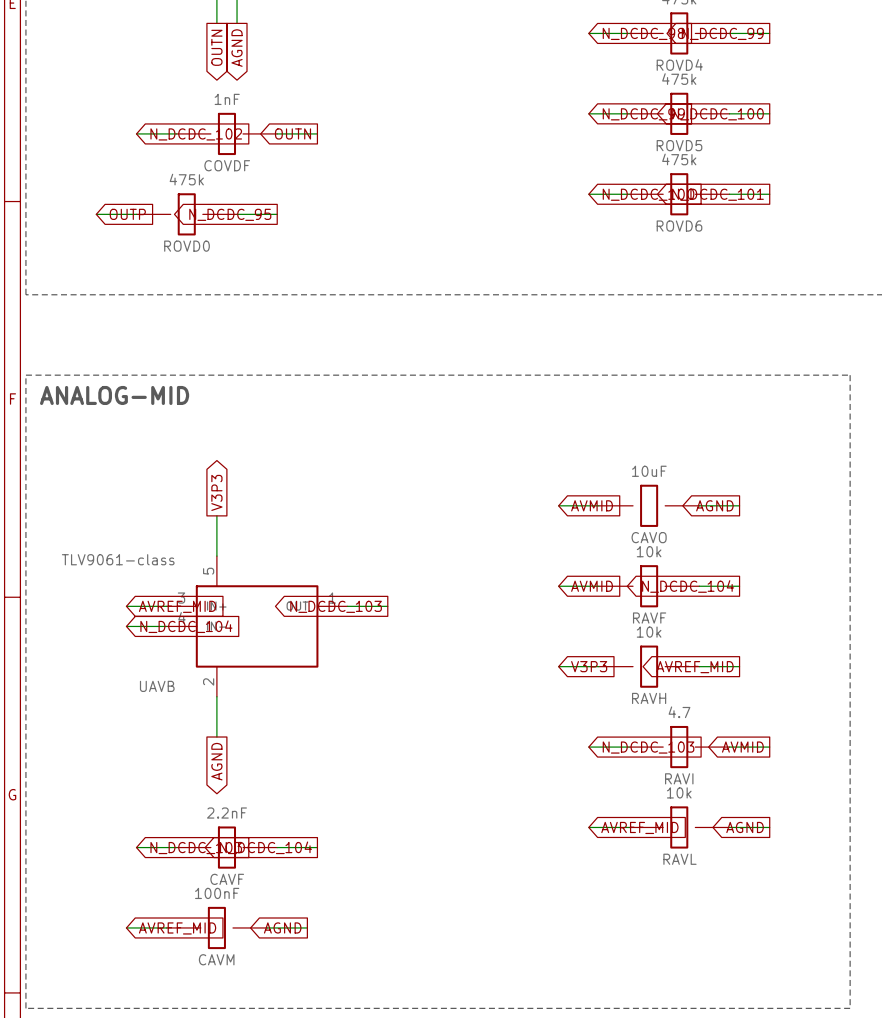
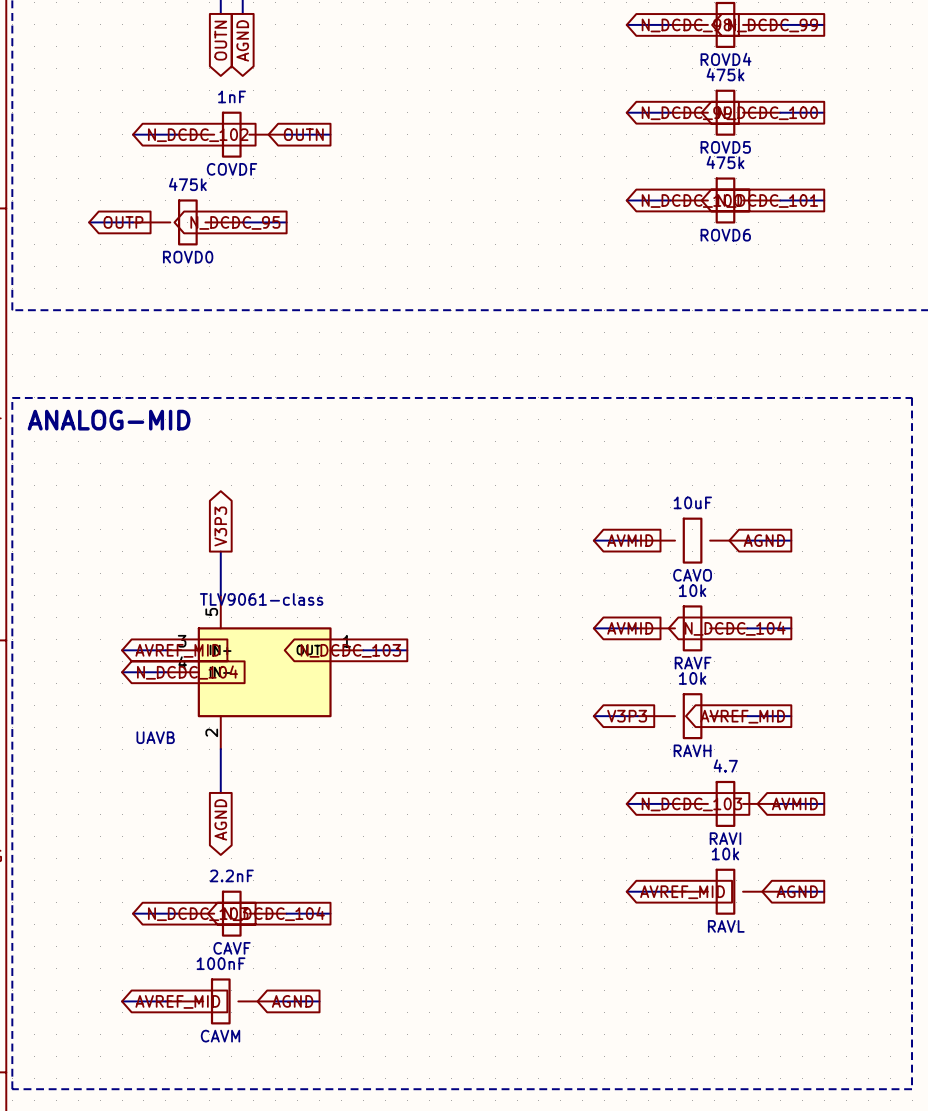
UAVB value position: TLV9061-class (118, 559) -> TLV9061-class (261, 599)

